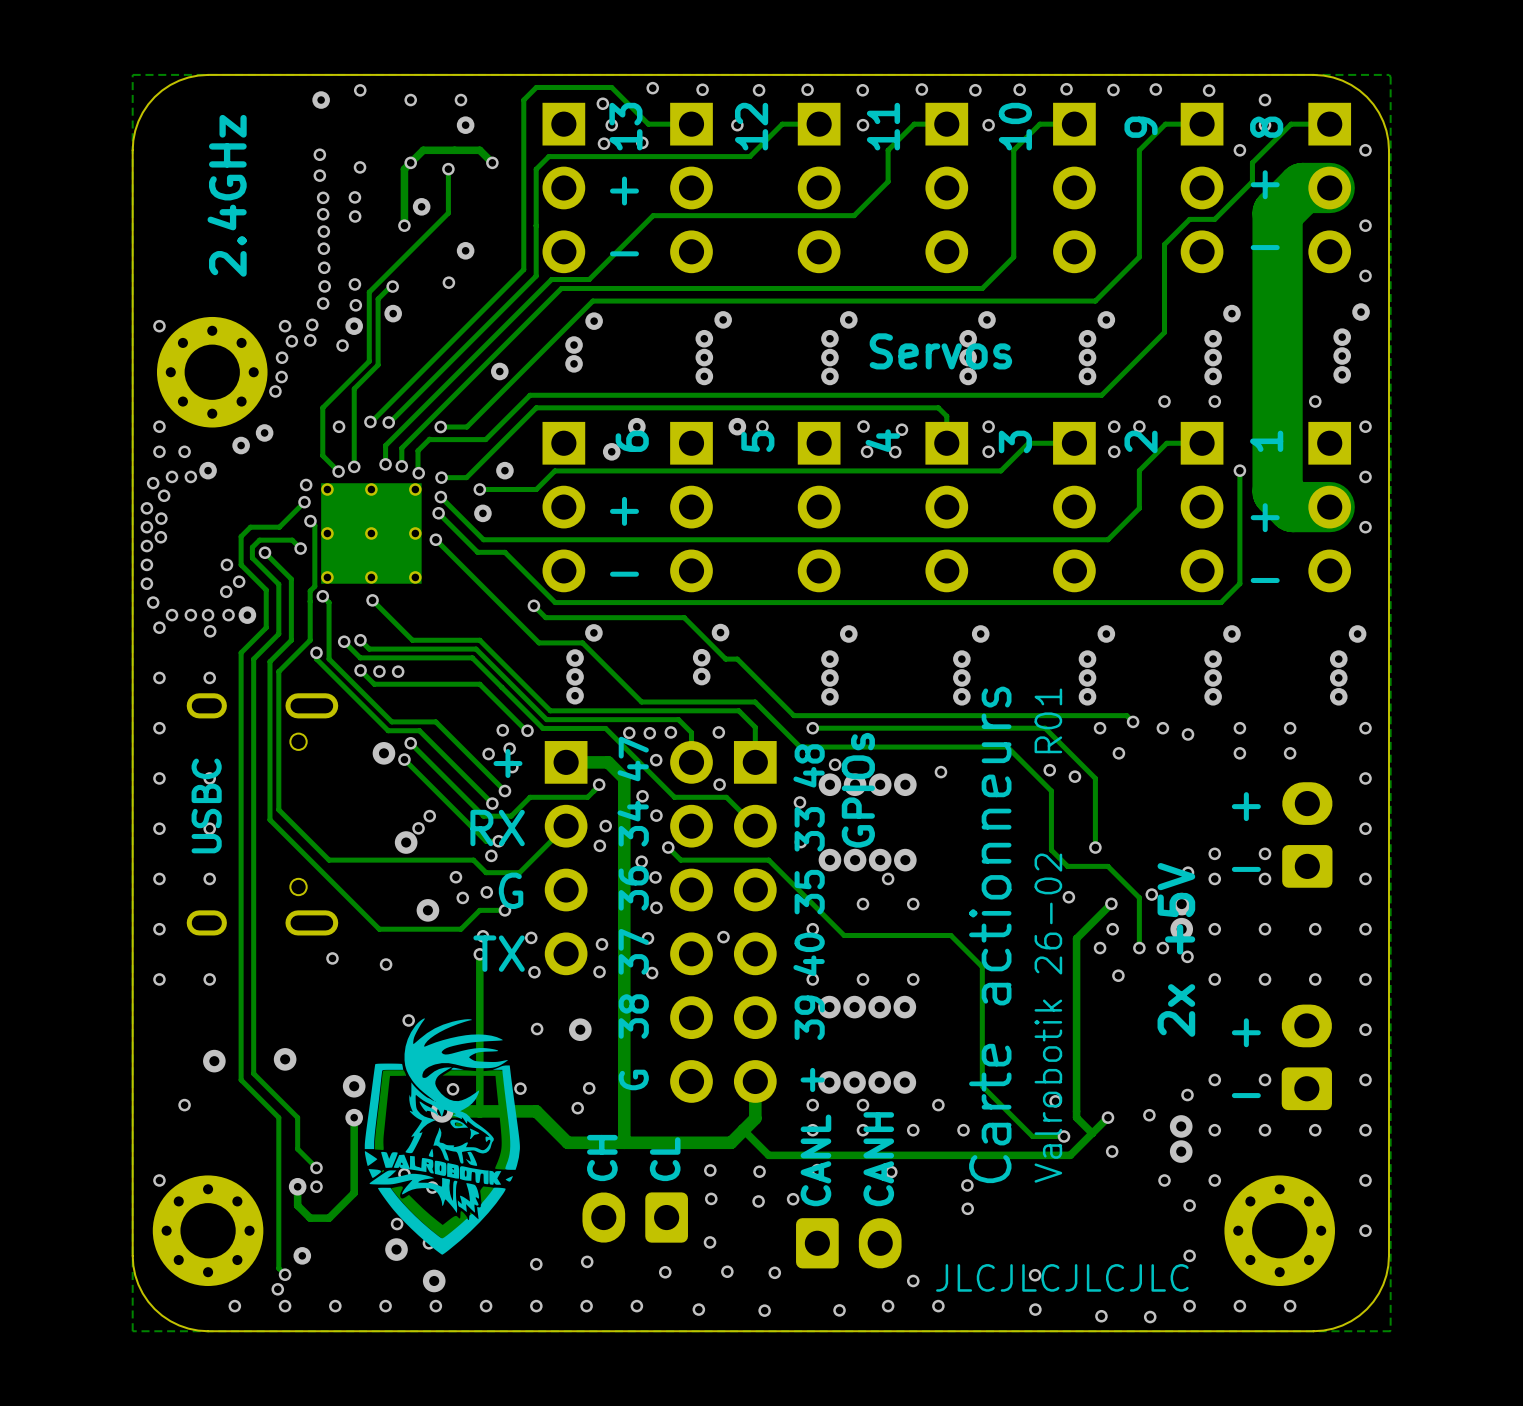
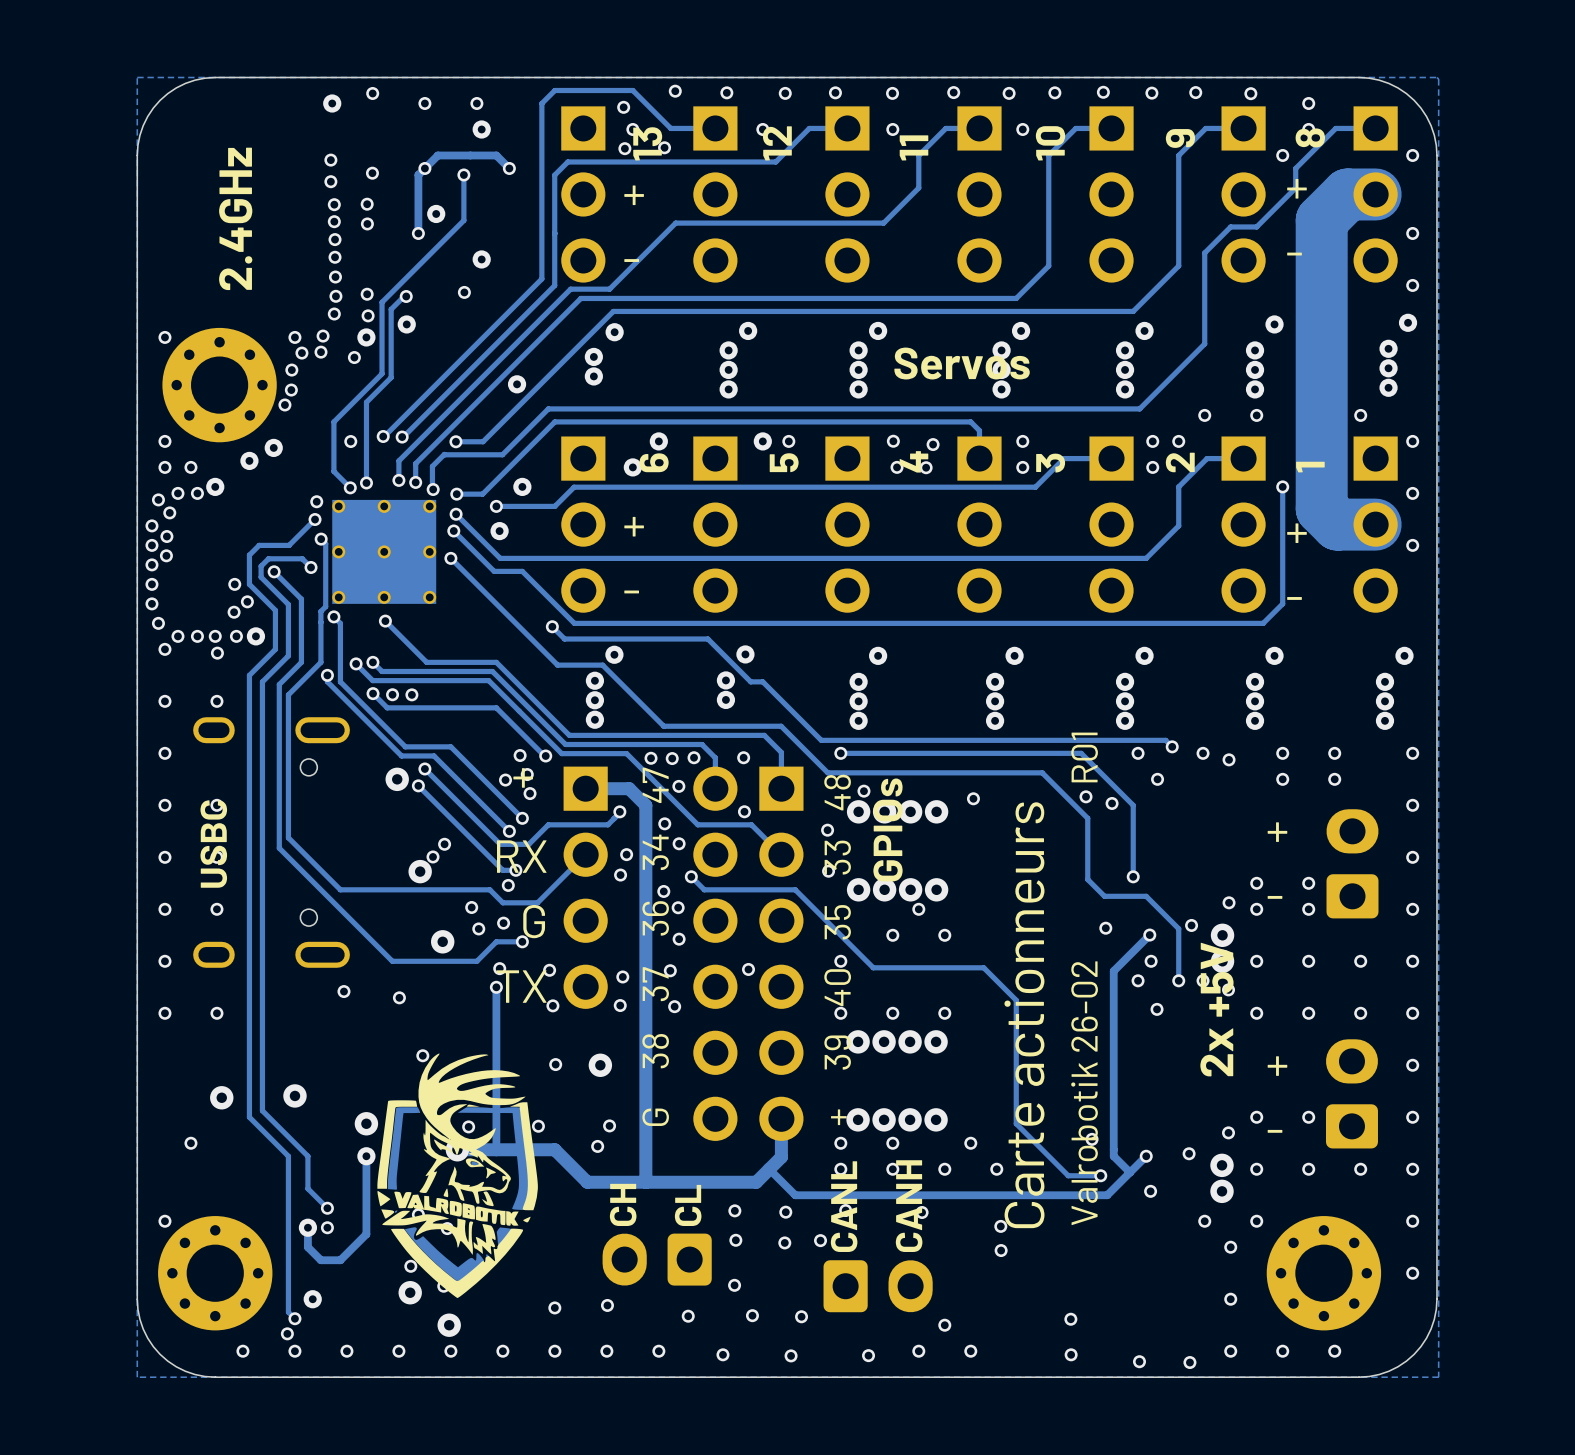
text: JLCJLCJLCJLC (1062, 1277) -> none

